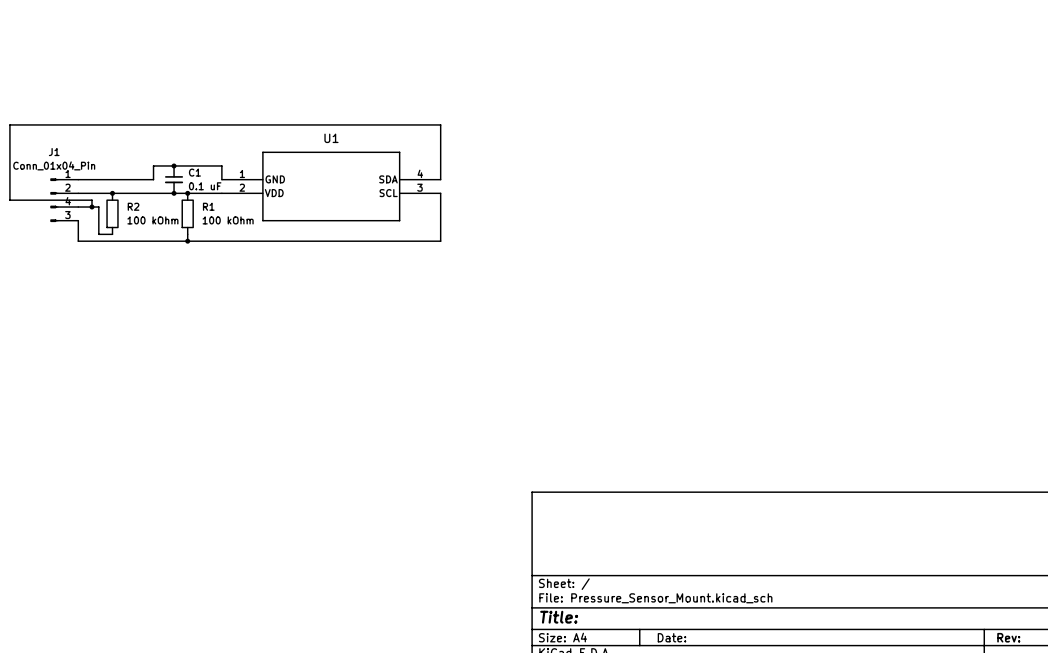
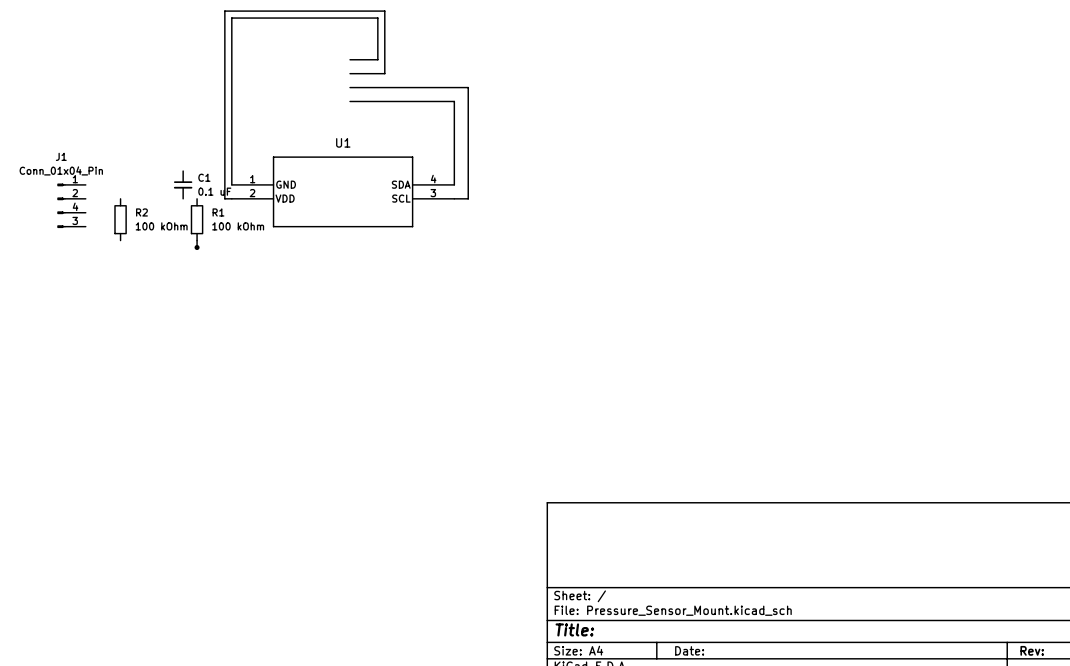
wire: (440, 124) (9, 124) (9, 200) (91, 200) (91, 207) -> (454, 129) (454, 101) (350, 101)
junction: (174, 165) -> none
wire: (221, 165) (153, 165) (153, 179) (78, 179) -> (231, 171) (231, 18) (377, 18) (377, 59) (350, 59)
wire: (78, 193) (215, 193) -> (350, 73) (384, 73) (384, 11) (224, 11) (224, 198)
junction: (112, 193) -> none
junction: (174, 193) -> none
junction: (187, 193) -> none
wire: (440, 193) (440, 241) (78, 241) (78, 220) -> (454, 198) (468, 198) (468, 87) (350, 87)
wire: (78, 207) (98, 207) (98, 234) (112, 234) -> none
junction: (91, 207) -> none

